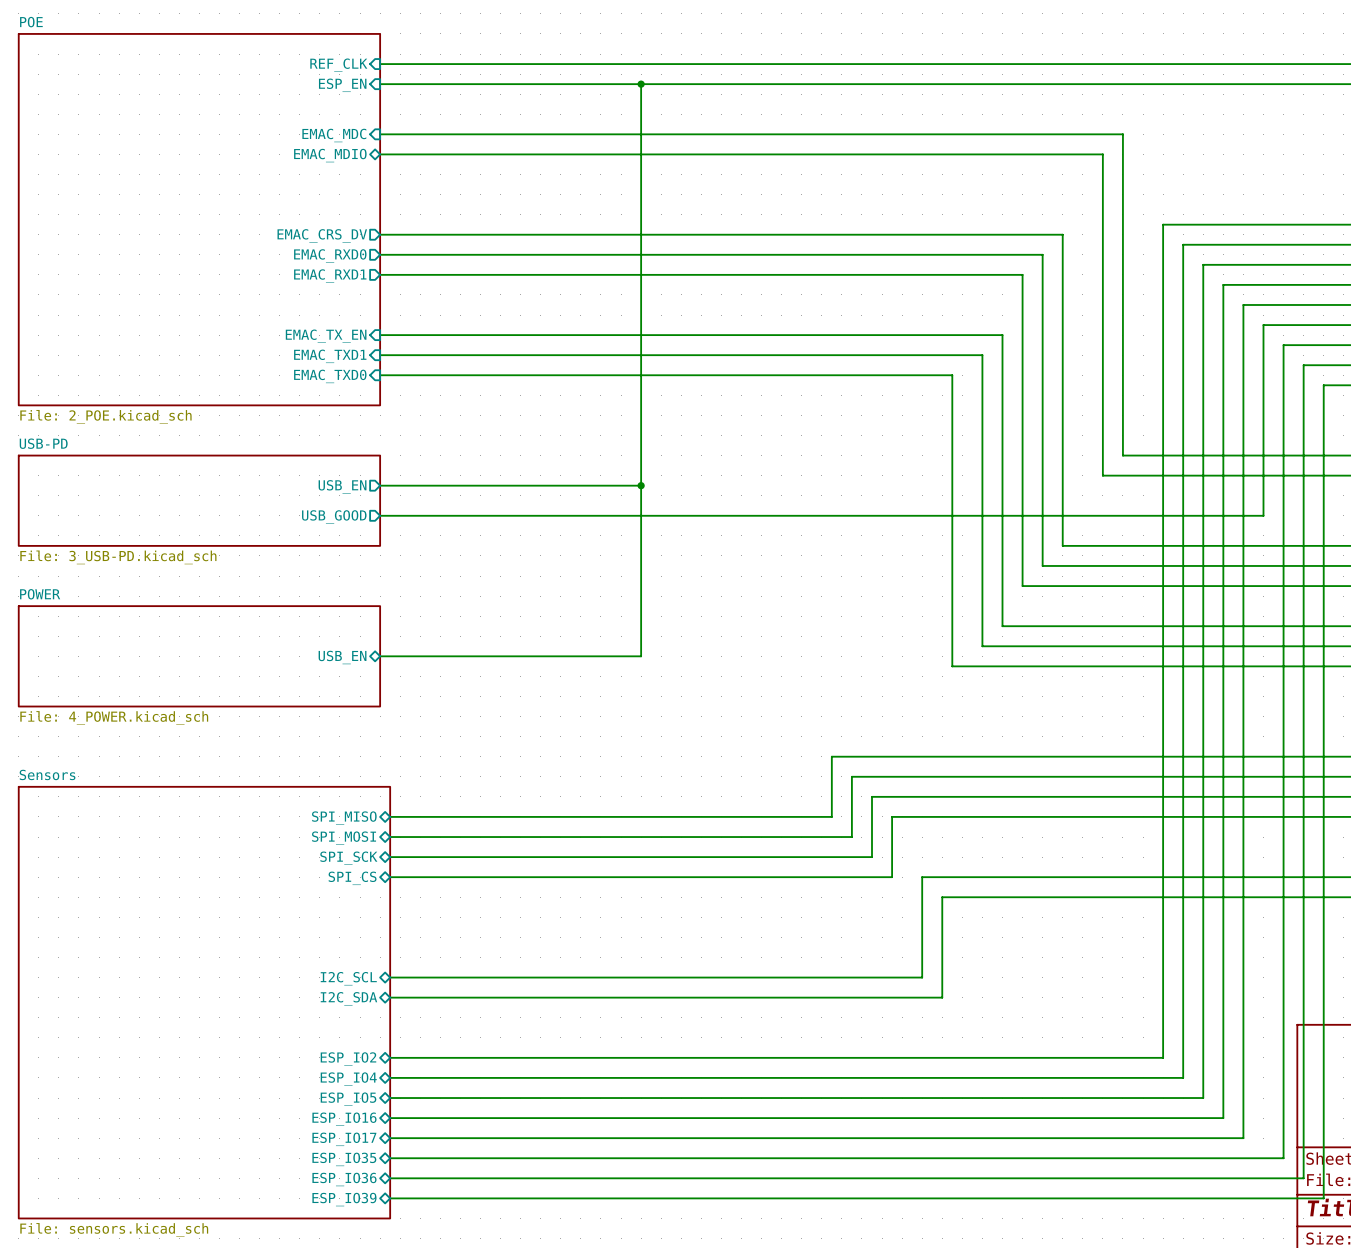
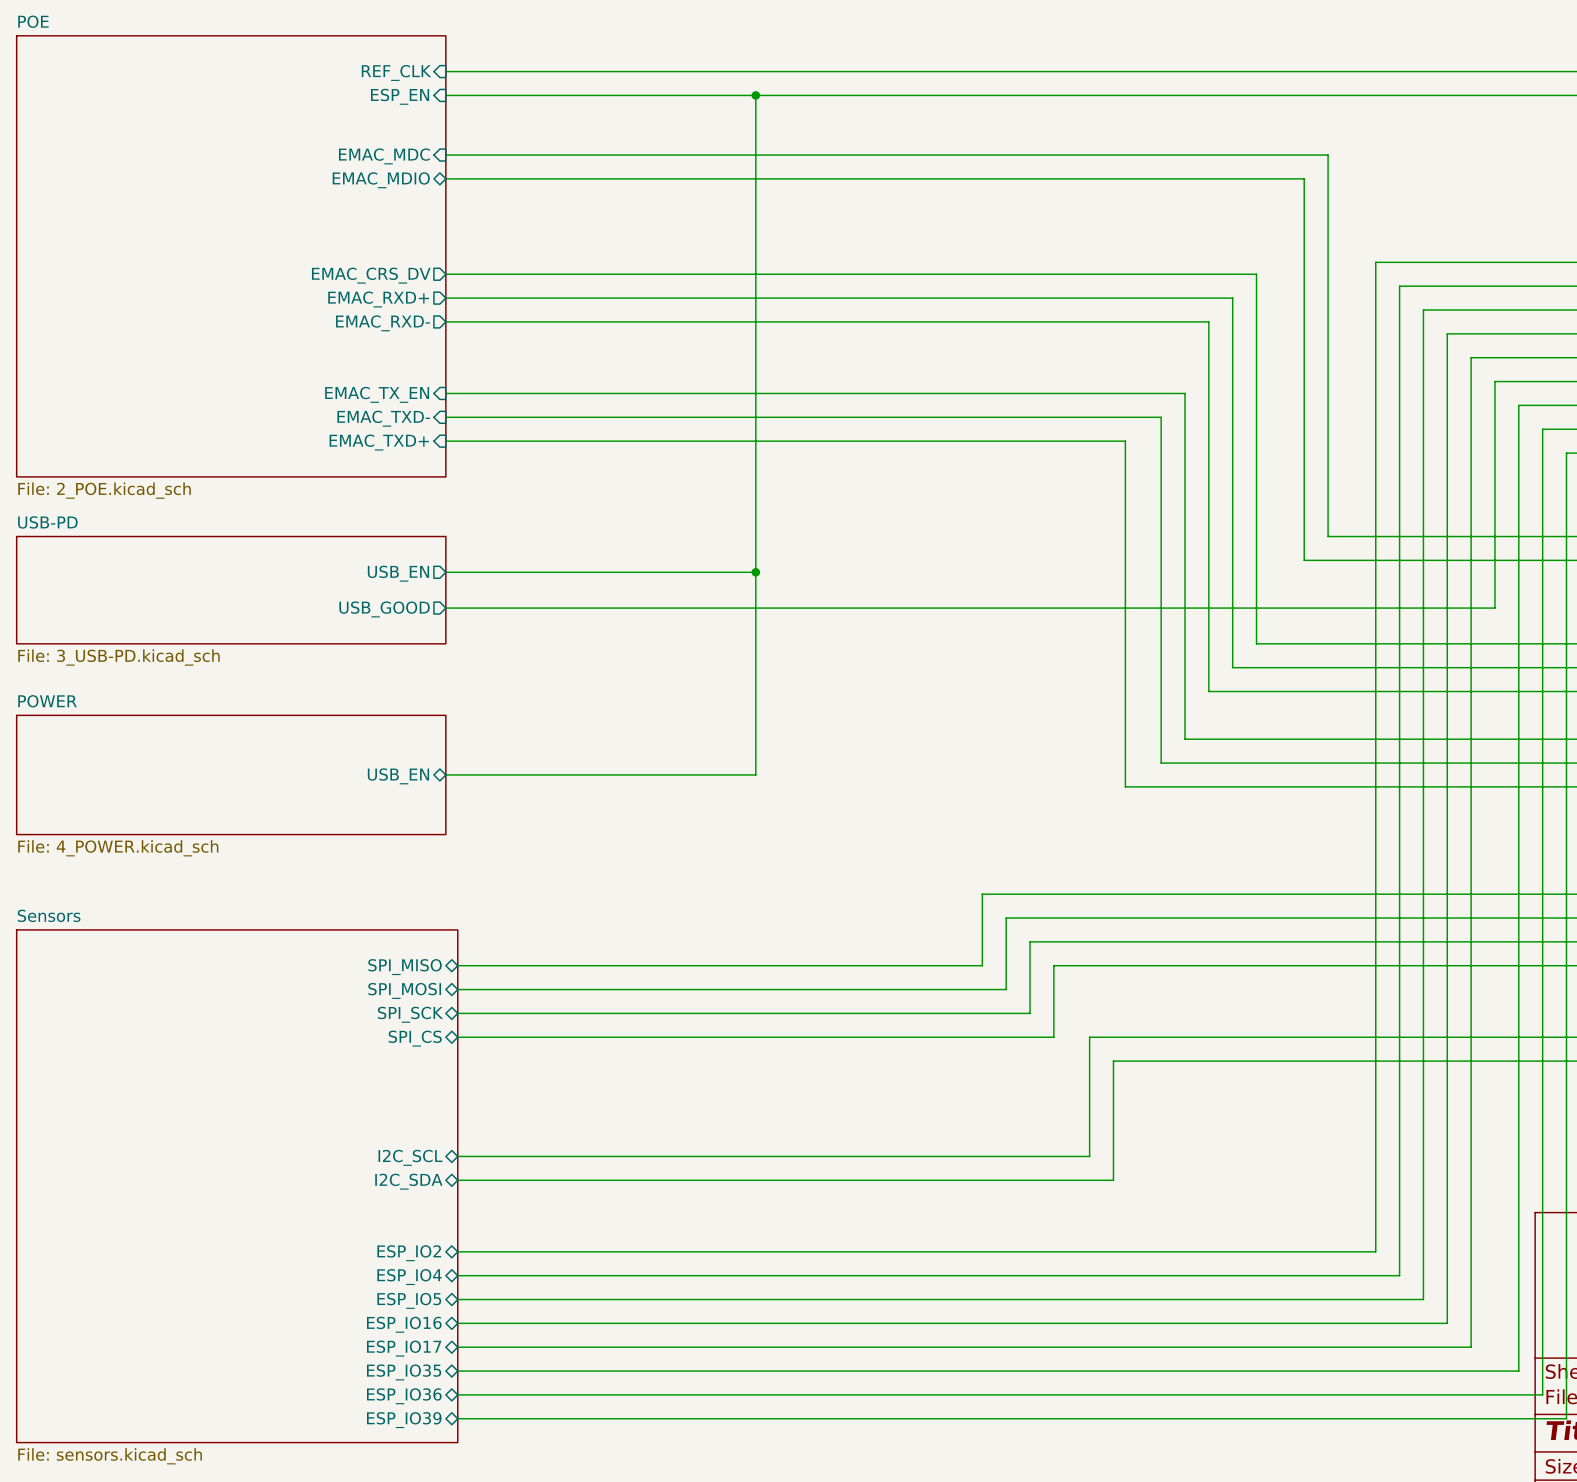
sheet pin: EMAC_RXD0 (330, 255) -> EMAC_RXD+ (378, 299)
sheet pin: EMAC_RXD1 (330, 276) -> EMAC_RXD- (382, 323)
sheet pin: EMAC_TXD1 (330, 356) -> EMAC_TXD- (383, 418)
sheet pin: EMAC_TXD0 (330, 376) -> EMAC_TXD+ (379, 442)

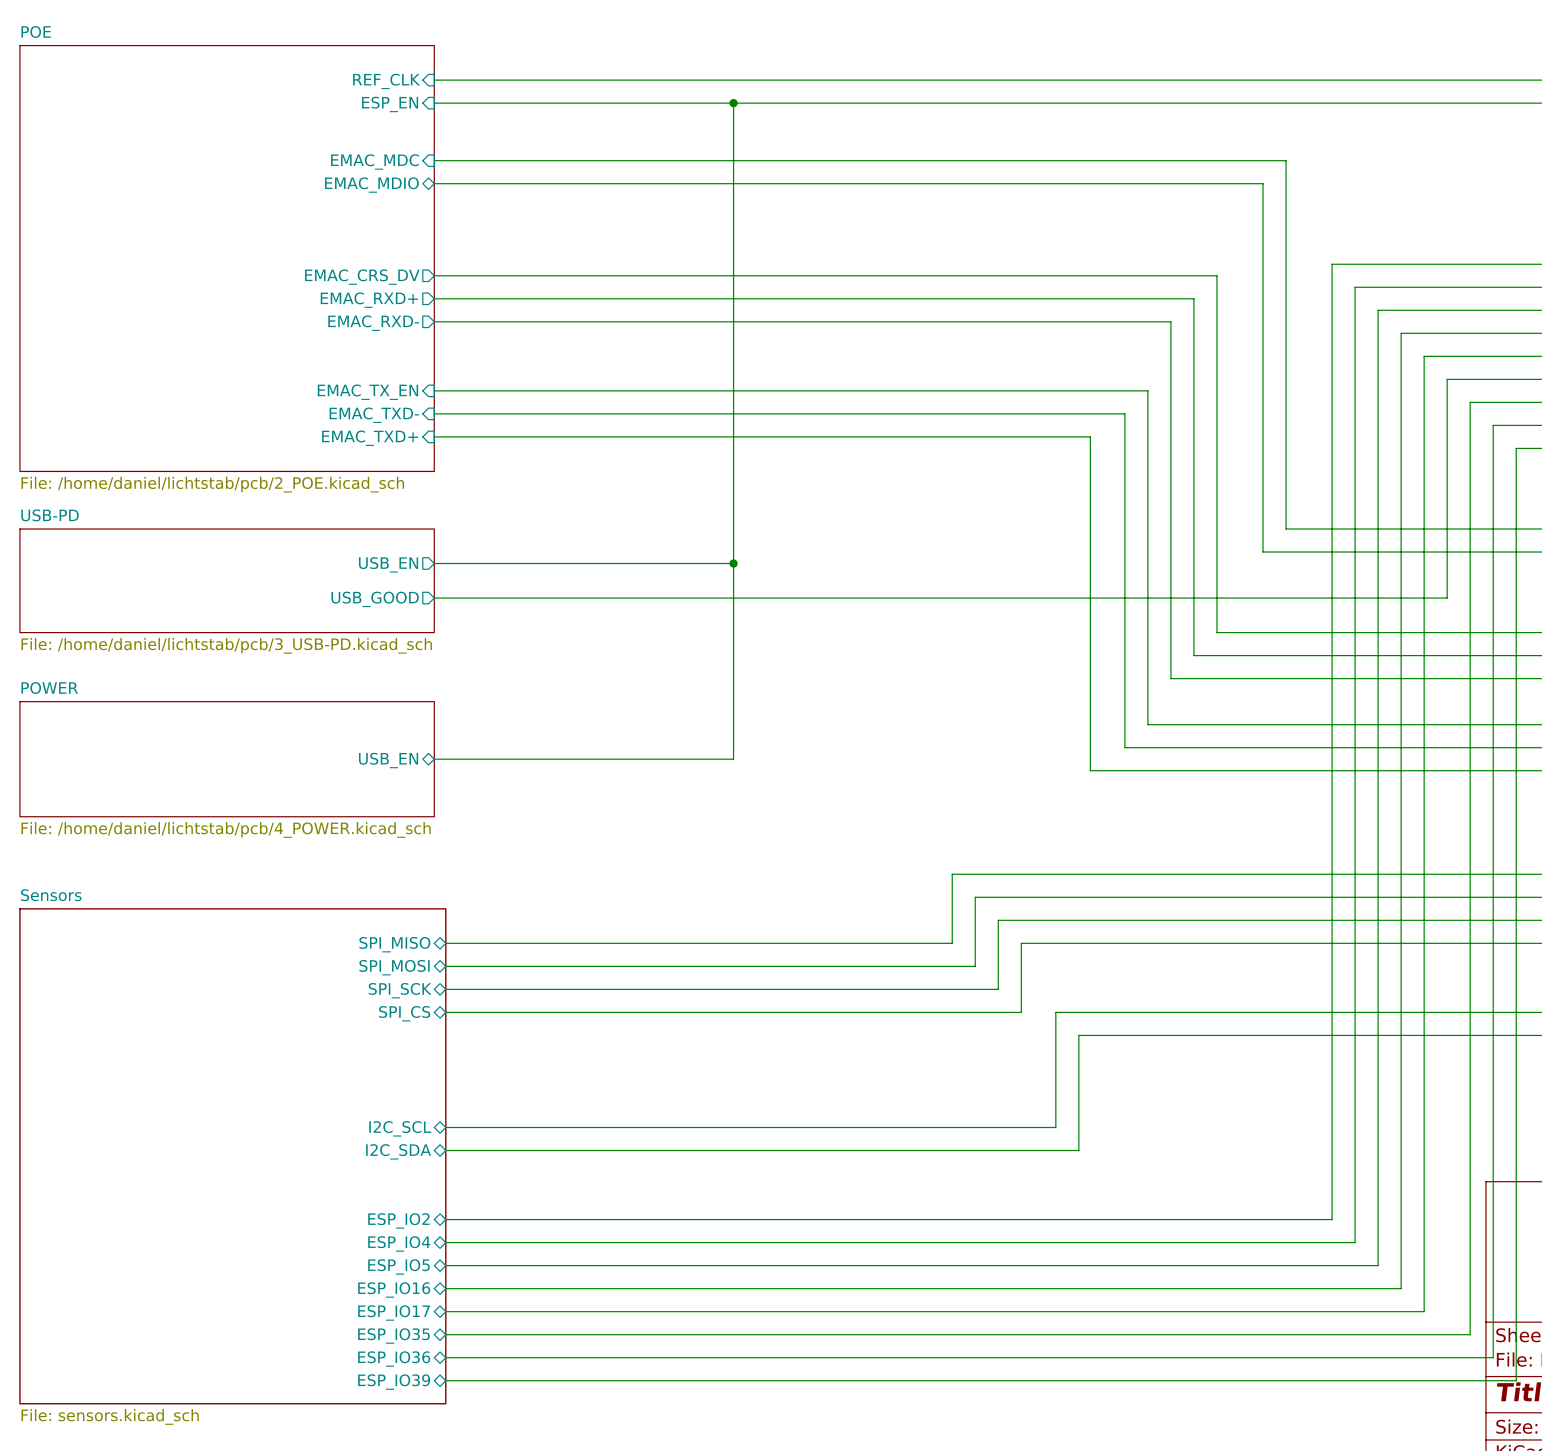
sheet POE value: File: 2_POE.kicad_sch (104, 490) -> File: /home/daniel/lichtstab/pcb/2_POE.kicad_sch (212, 484)
sheet USB-PD value: File: 3_USB-PD.kicad_sch (118, 657) -> File: /home/daniel/lichtstab/pcb/3_USB-PD.kicad_sch (226, 645)
sheet POWER value: File: 4_POWER.kicad_sch (118, 848) -> File: /home/daniel/lichtstab/pcb/4_POWER.kicad_sch (226, 829)

